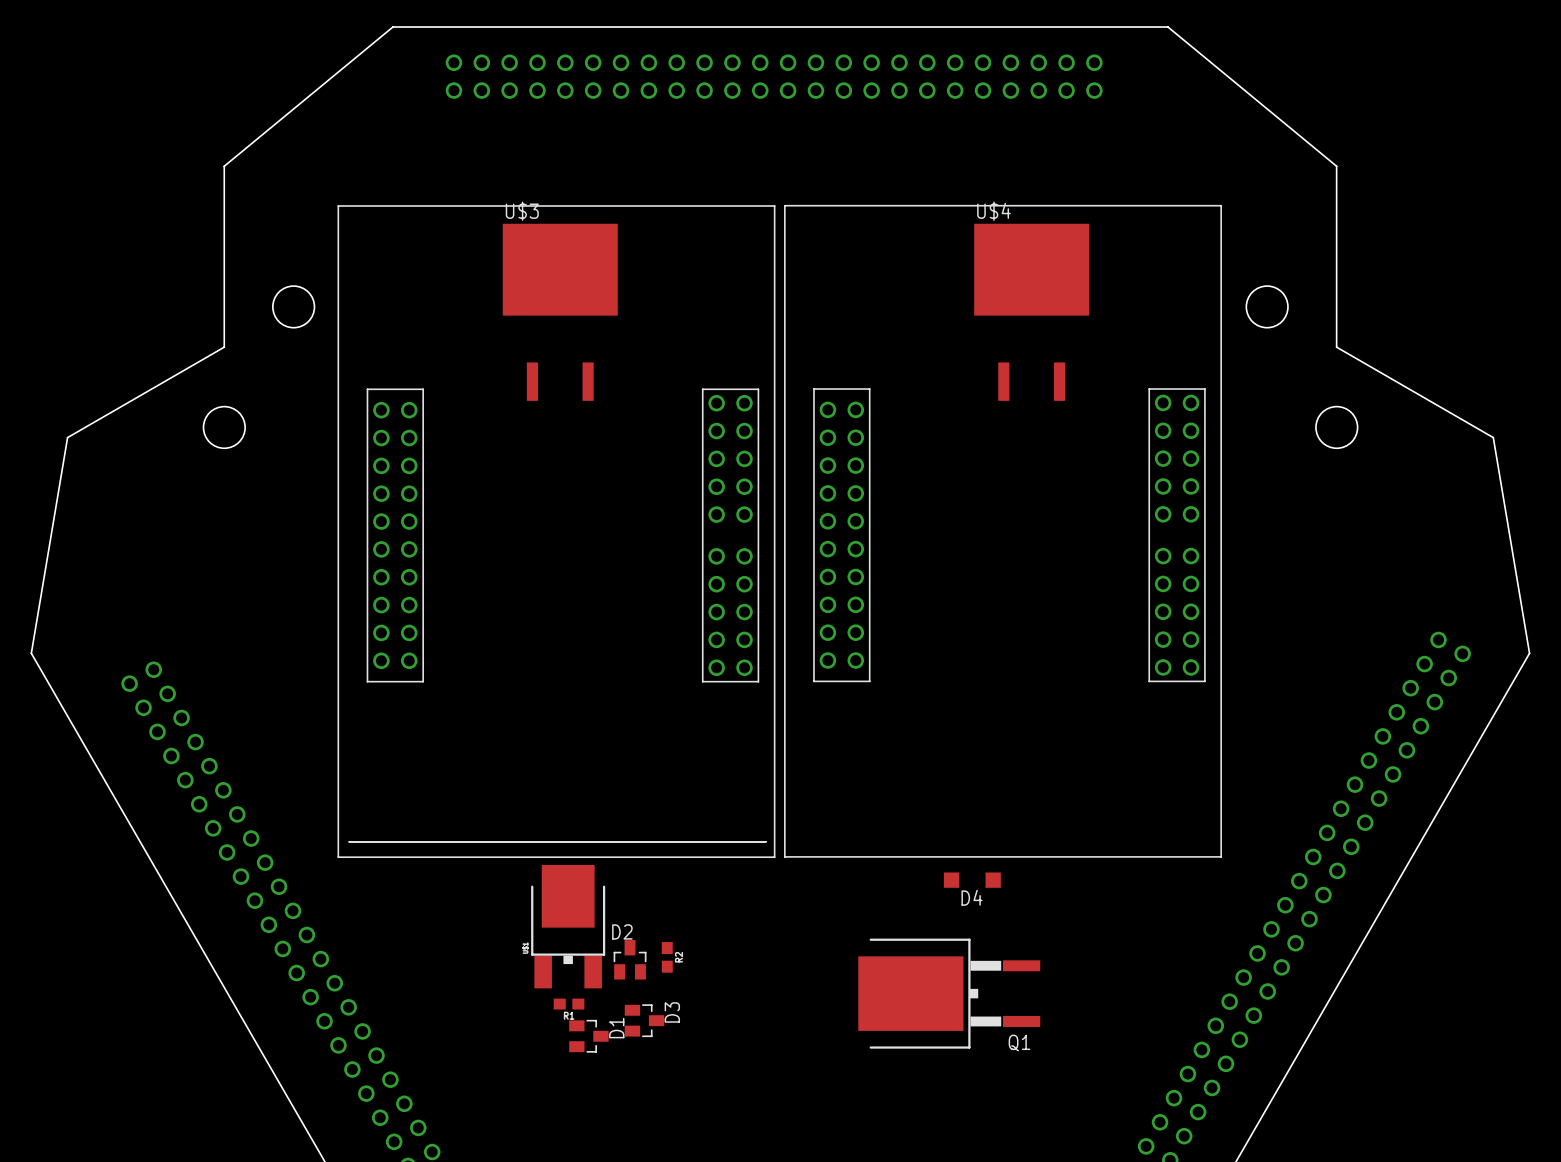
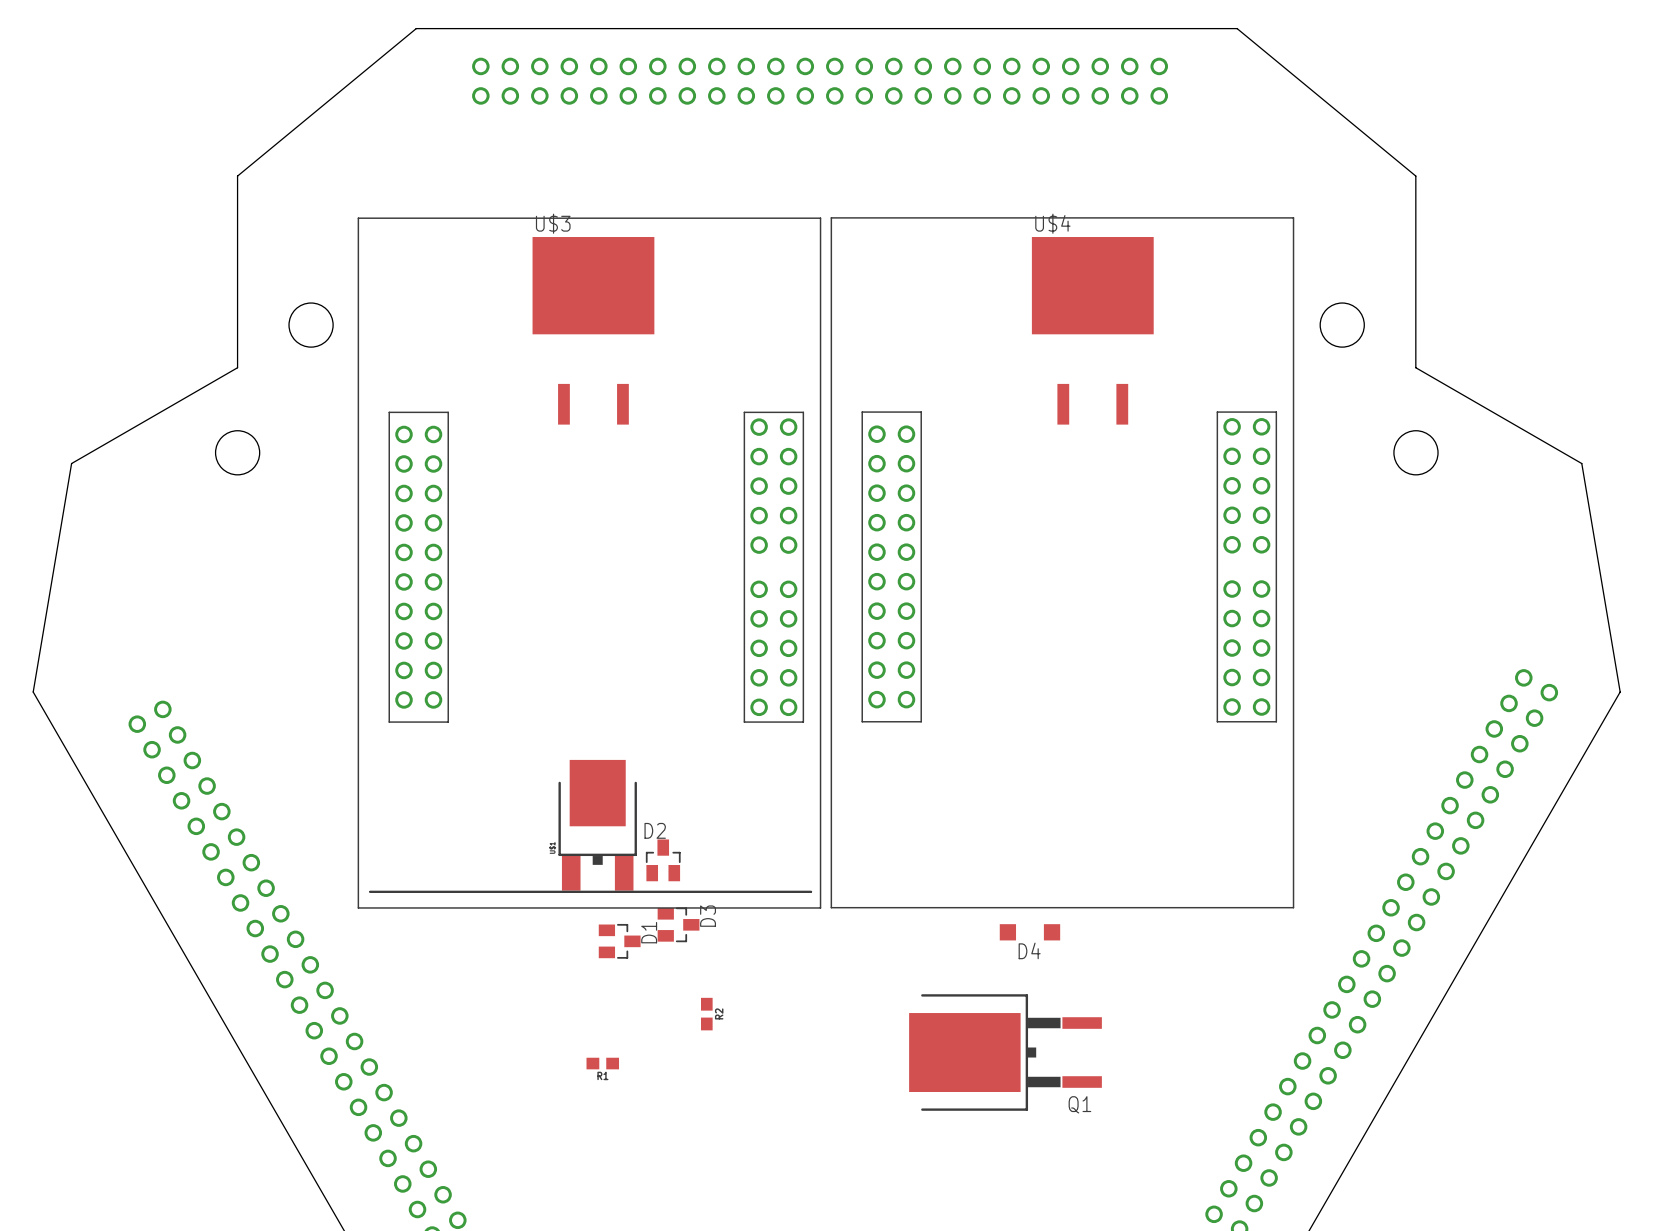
part position: (568, 926) -> (597, 825)
D2 position: (630, 959) -> (663, 860)
D3 position: (644, 1020) -> (678, 924)
D1 position: (588, 1036) -> (619, 941)

